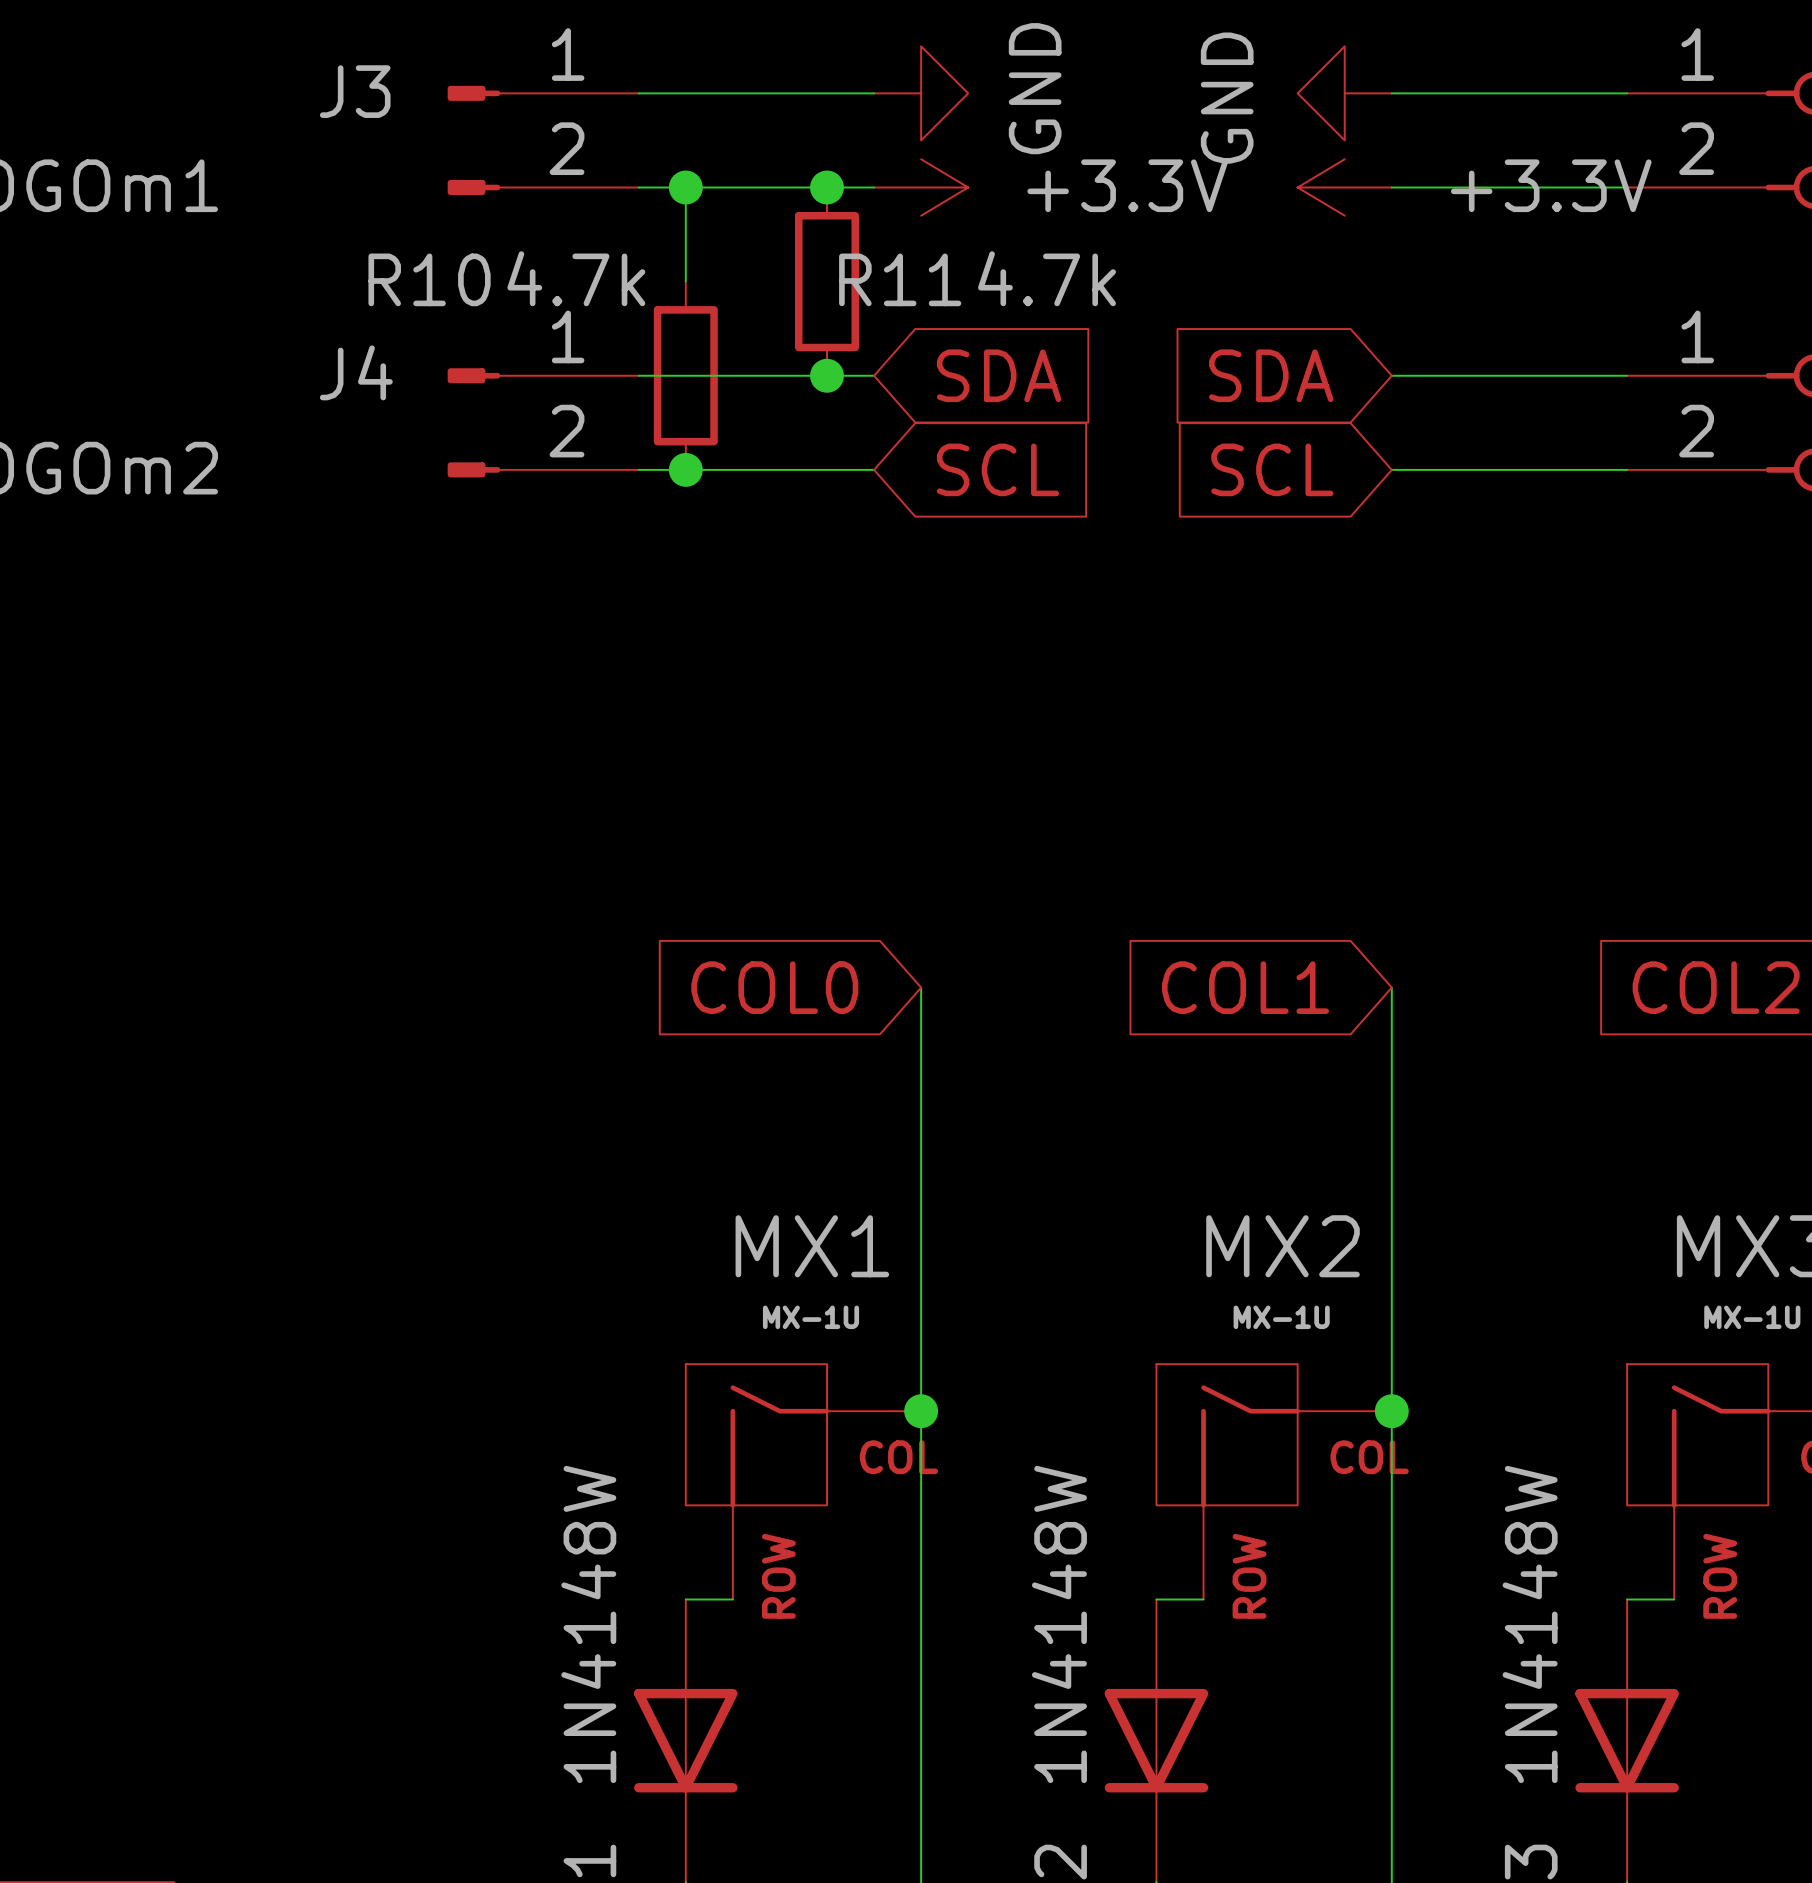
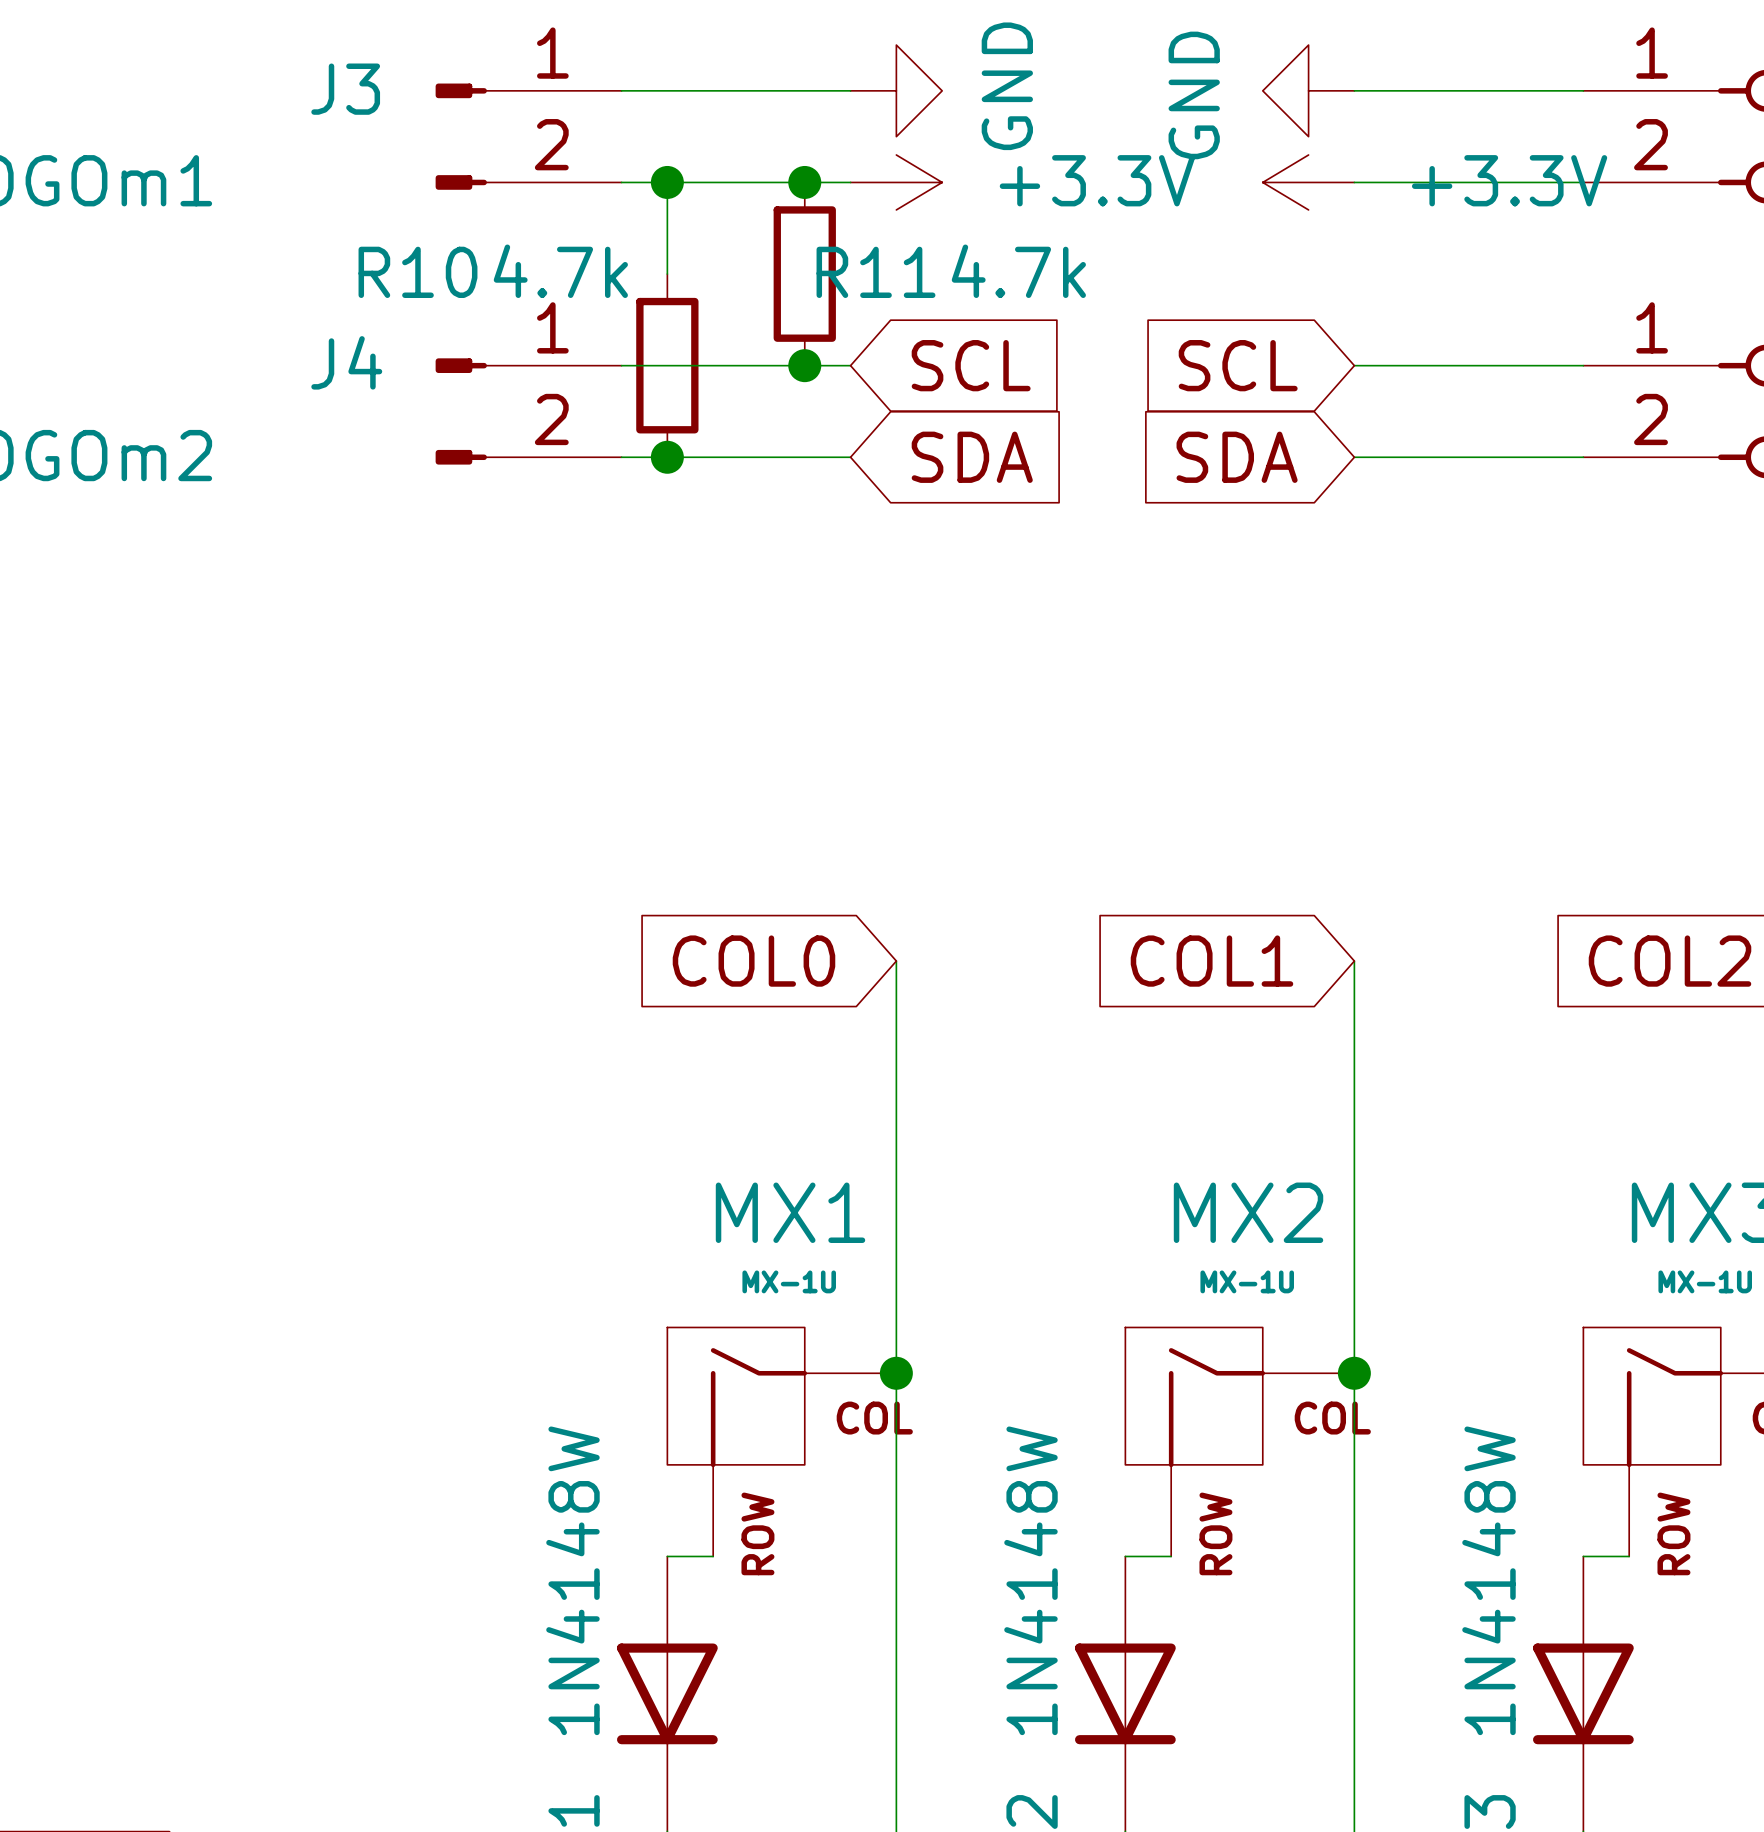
global label: SDA (999, 375) -> SCL (971, 365)
global label: SDA (1271, 375) -> SCL (1238, 365)
global label: SCL (997, 469) -> SDA (972, 457)
global label: SCL (1272, 469) -> SDA (1237, 457)

